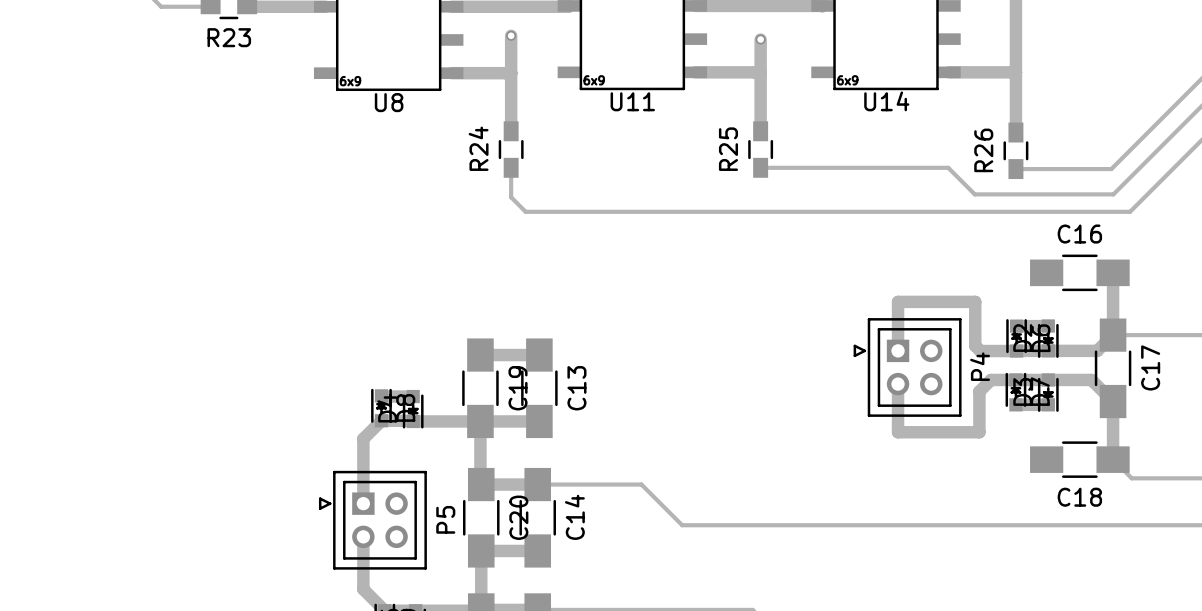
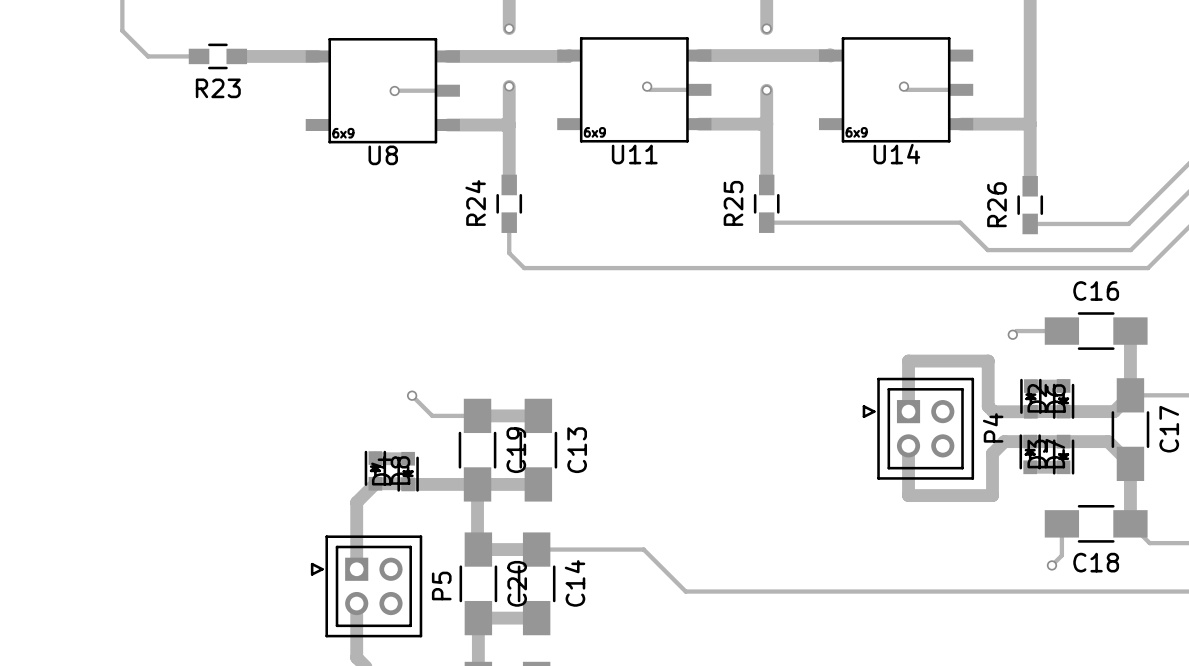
track: none -> (647, 86) (650, 89) (699, 89)
via: none -> (647, 86)
track: none -> (903, 86) (907, 89) (961, 89)
via: none -> (903, 86)
track: none -> (447, 90) (394, 90)
via: none -> (394, 90)
track: none -> (1061, 331) (1016, 331) (1012, 334)
via: none -> (1012, 334)
track: none -> (412, 395) (432, 415) (477, 415)
via: none -> (412, 395)
track: none -> (1061, 523) (1061, 555) (1051, 565)
via: none -> (1051, 565)

